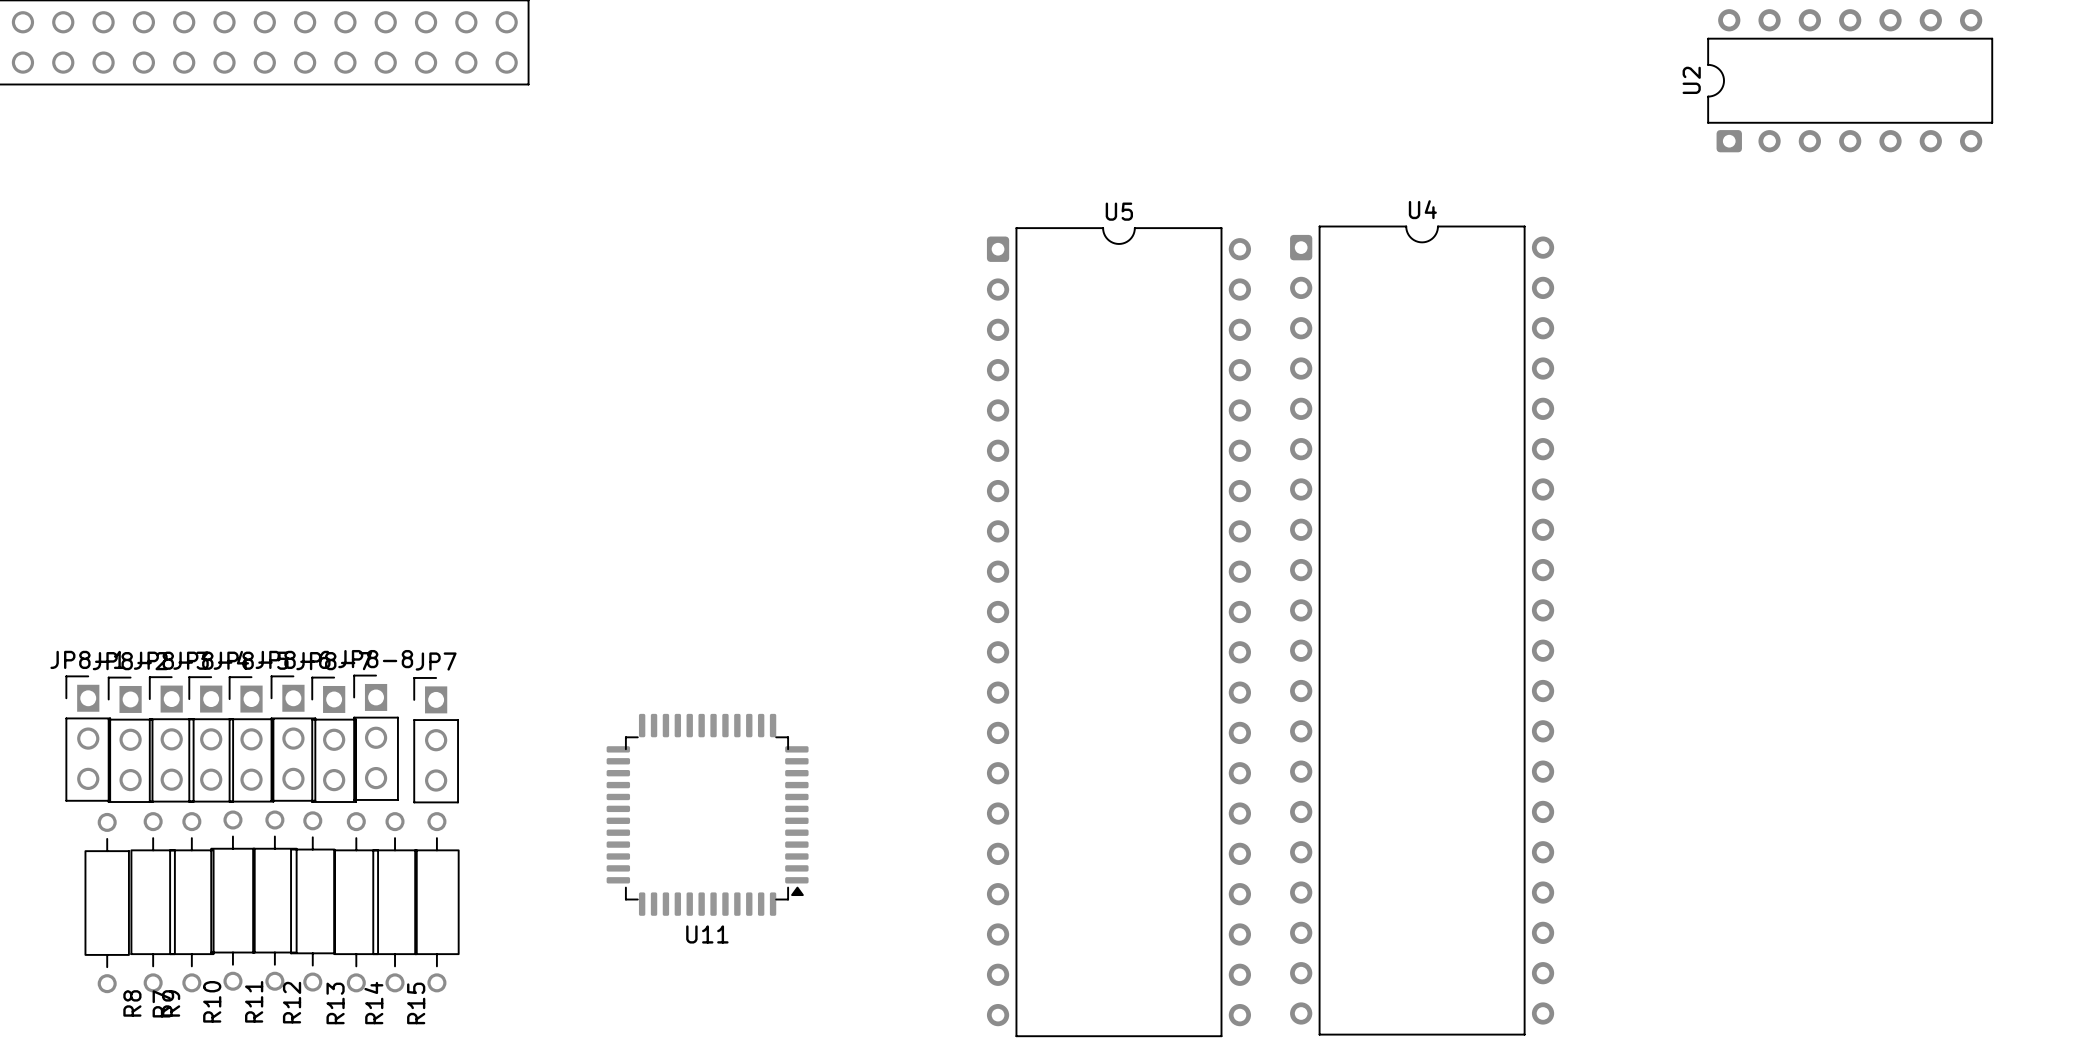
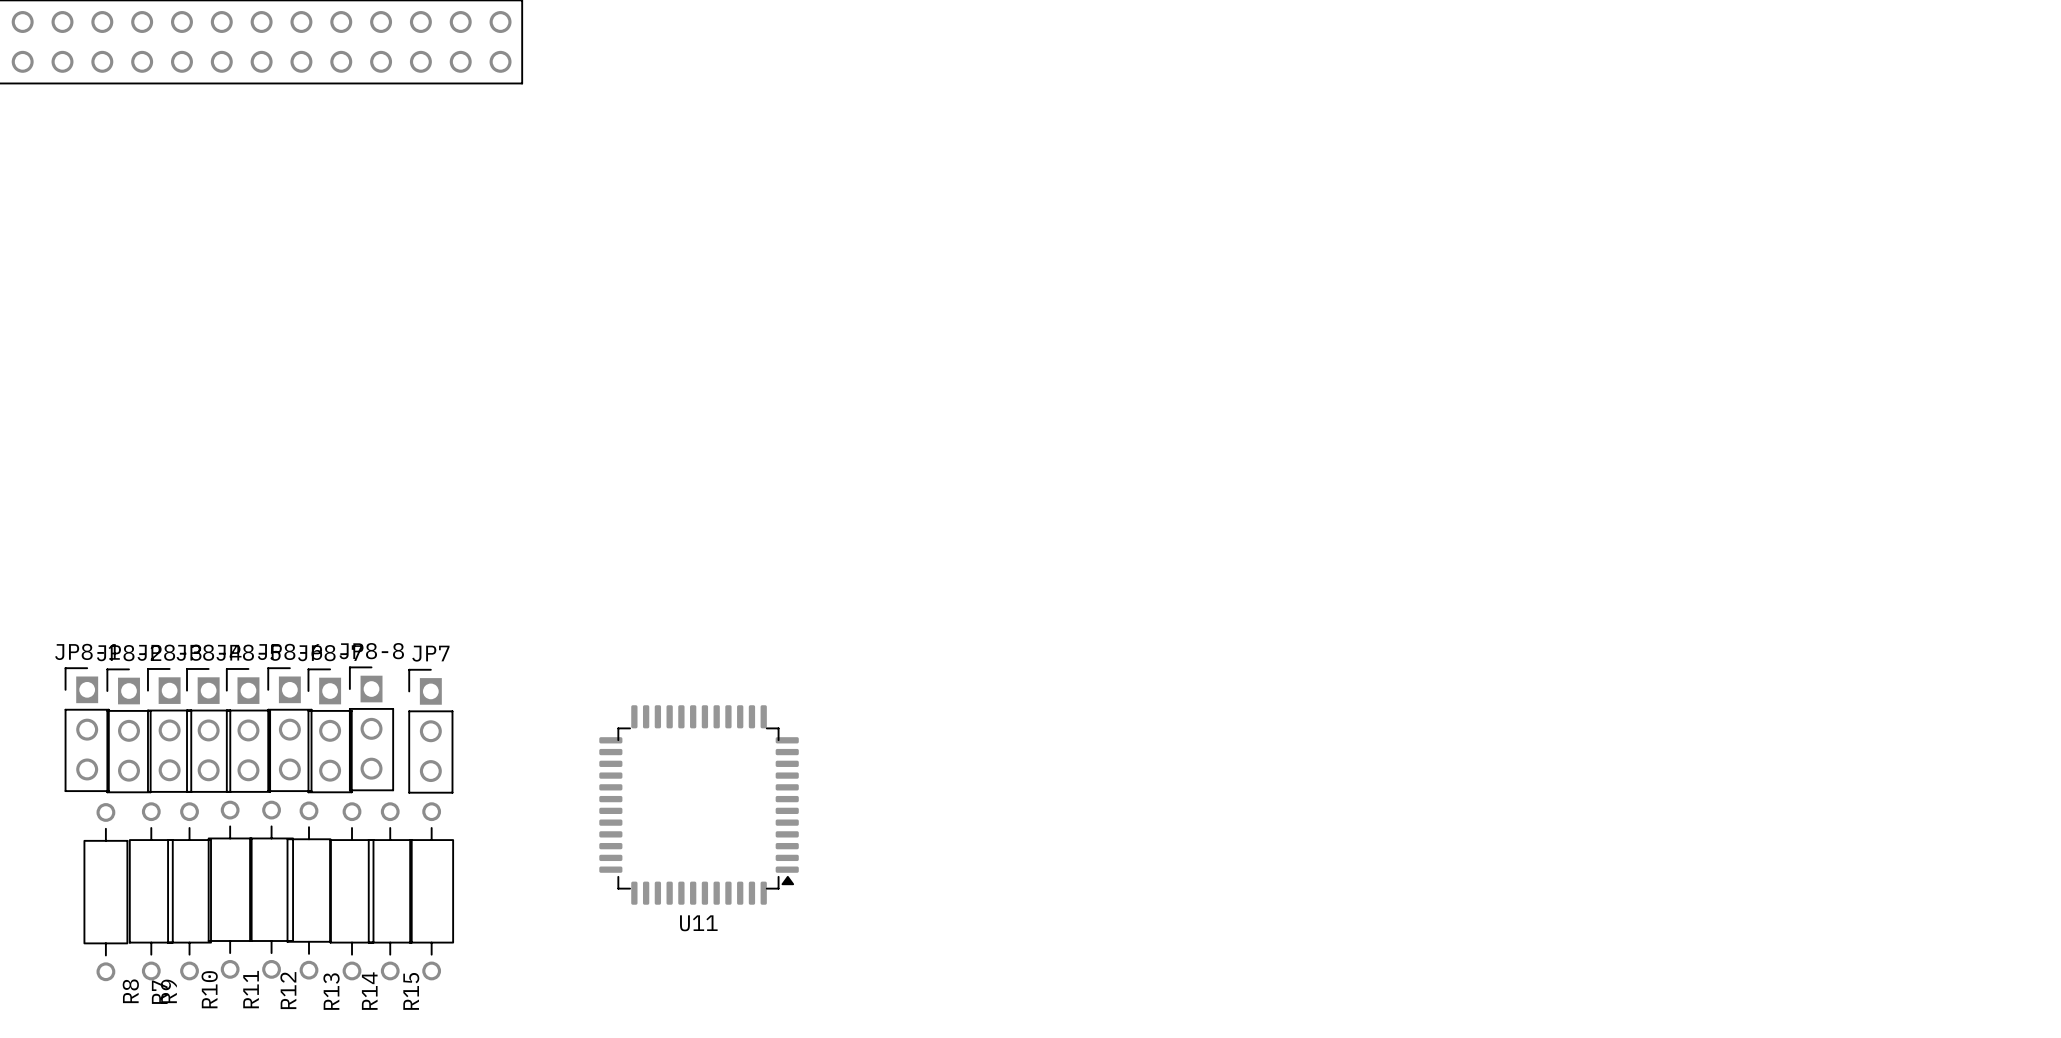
U2: (1850, 80) -> none
U4: (1422, 630) -> none
U5: (1118, 632) -> none

